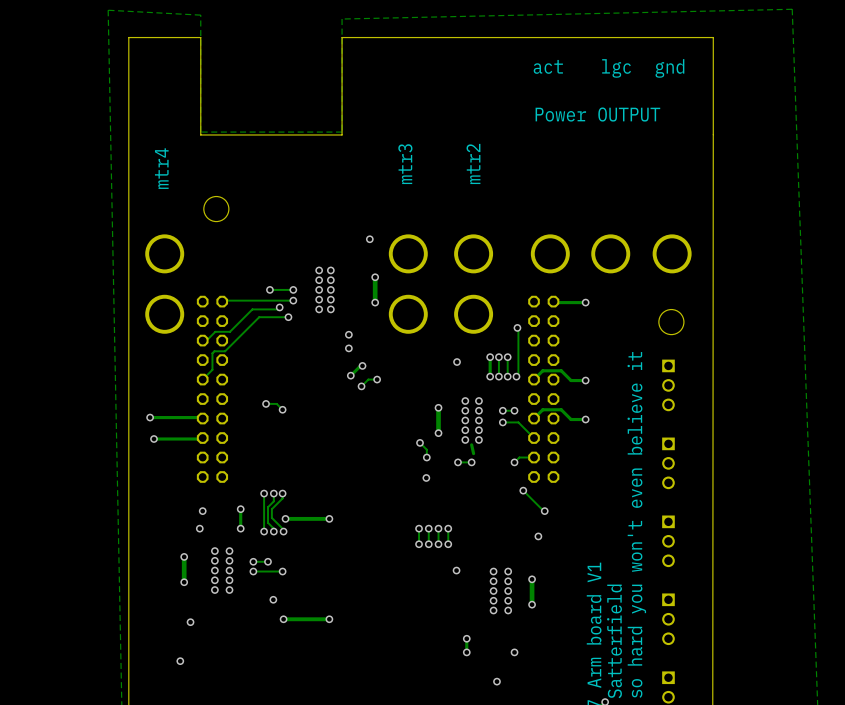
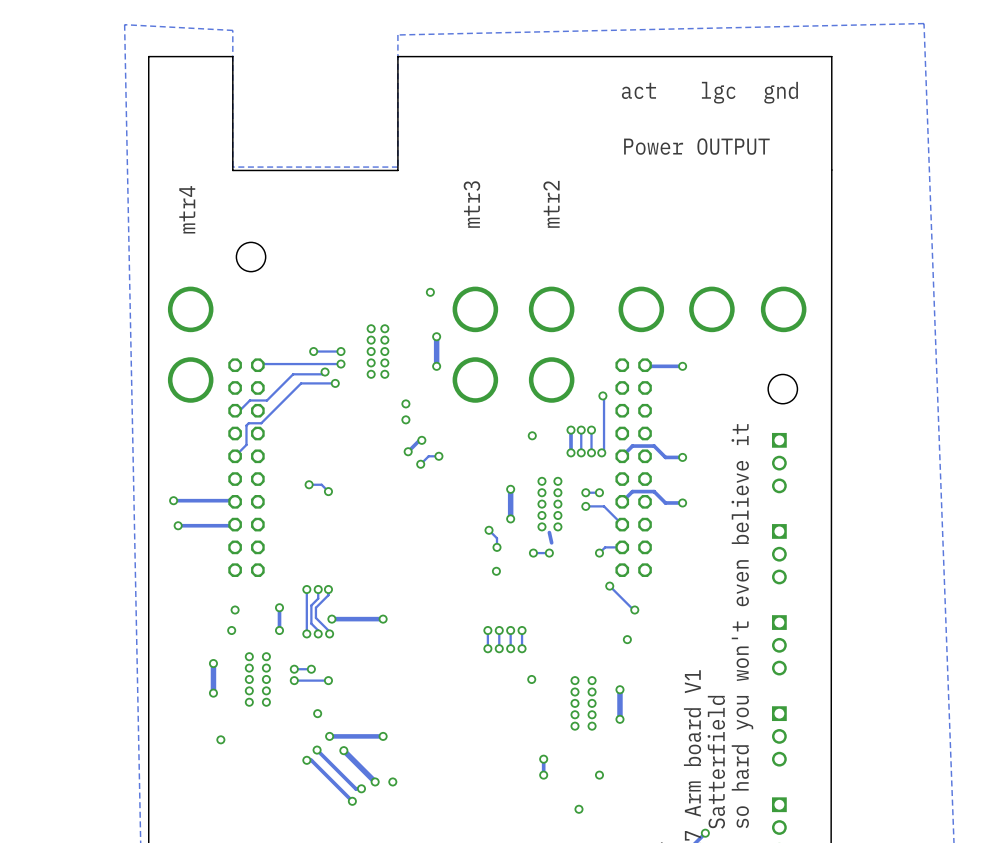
track: none -> (317, 750) (355, 788) (361, 788)
via: none -> (317, 750)
track: none -> (343, 750) (375, 781)
via: none -> (343, 750)
track: none -> (306, 760) (311, 760) (352, 801)
via: none -> (306, 760)
via: none -> (375, 781)
via: none -> (392, 781)
via: (180, 661) -> none
via: none -> (361, 788)
via: none -> (352, 801)

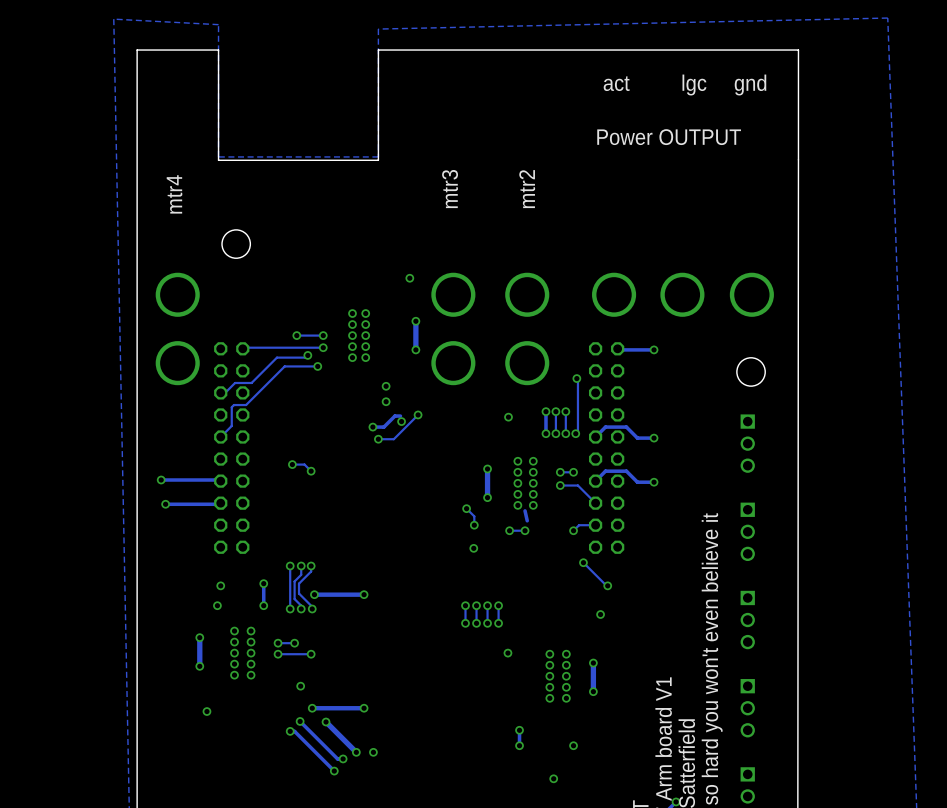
track: none -> (418, 414) (393, 439) (378, 439)
via: none -> (418, 414)
track: none -> (400, 416) (394, 416) (383, 427) (372, 427)
track: (421, 440) (408, 451) -> none
via: none -> (372, 427)
via: (408, 451) -> none
track: (438, 456) (428, 456) (420, 464) -> none
via: (438, 456) -> none
via: none -> (378, 439)
via: (420, 464) -> none

